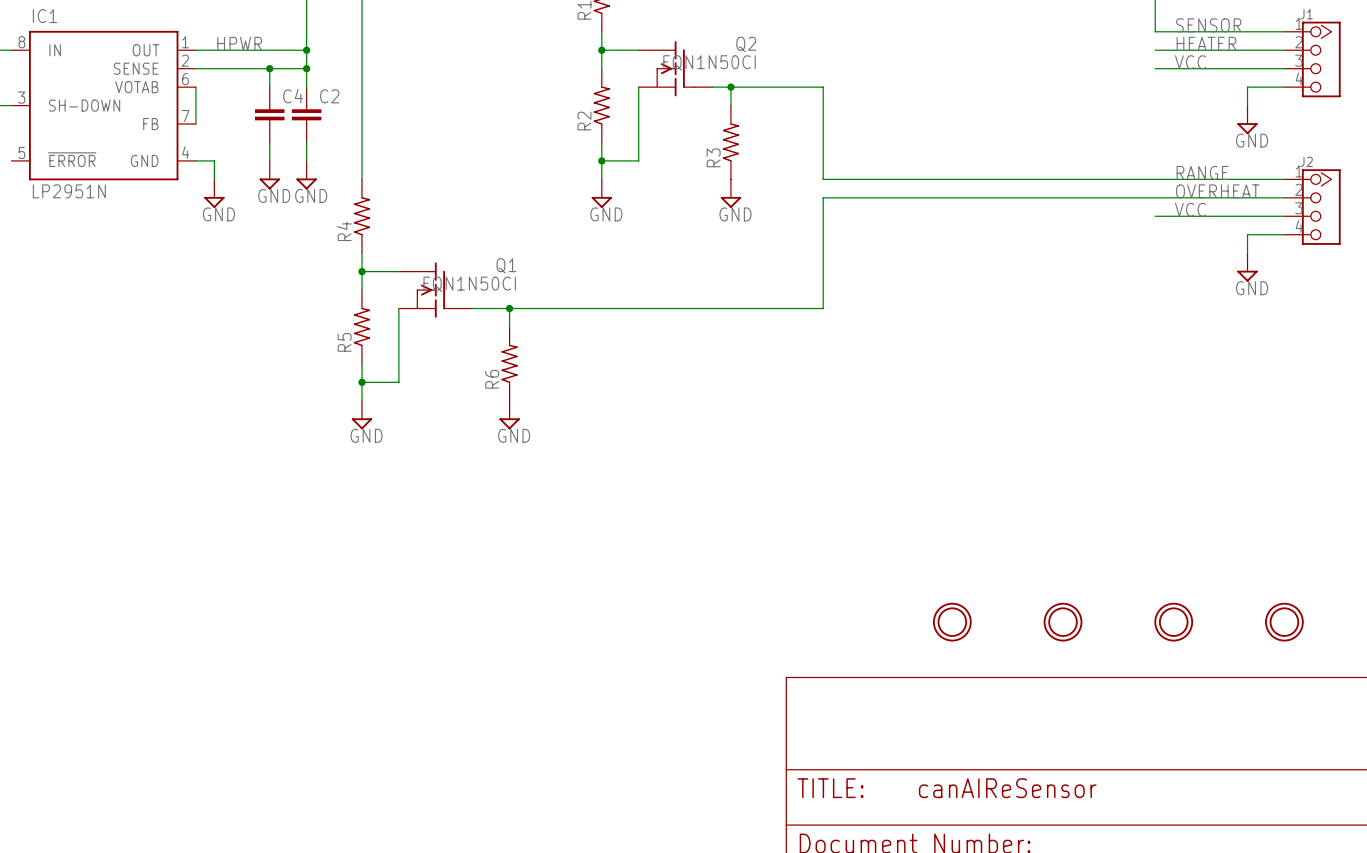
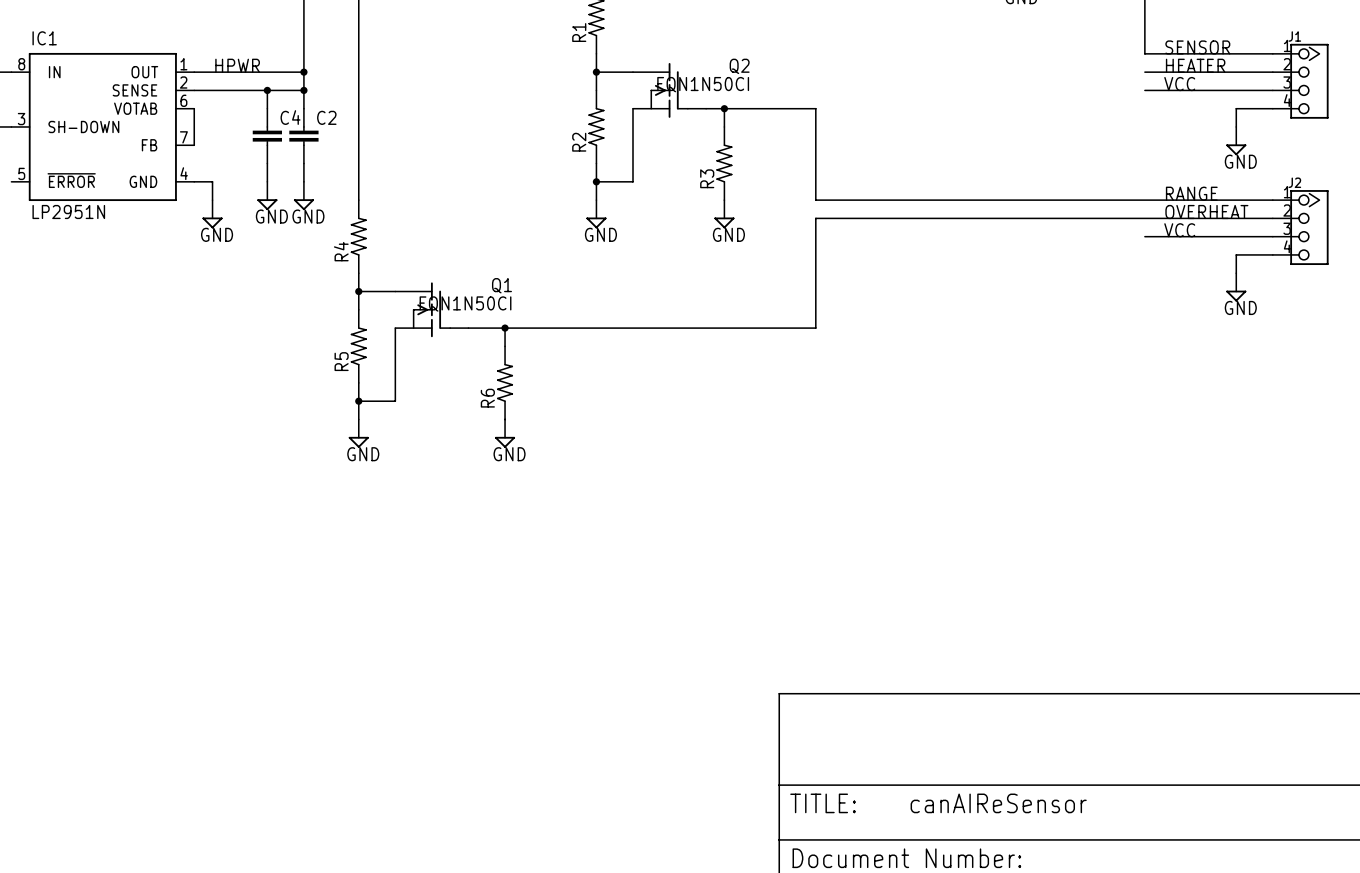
part: (952, 622) -> none
part: (1063, 622) -> none
part: (1173, 622) -> none
part: (1284, 622) -> none

